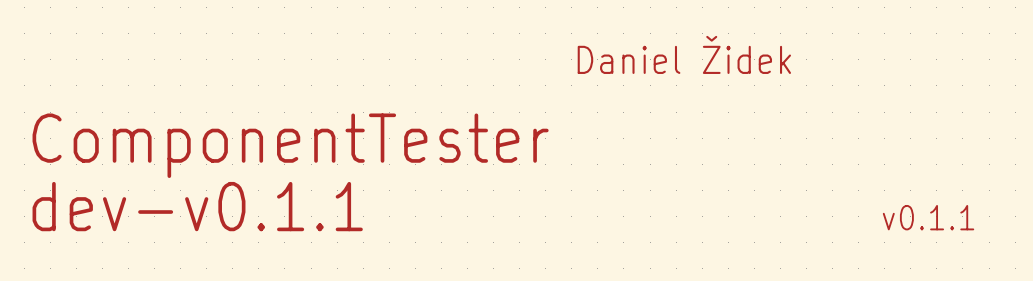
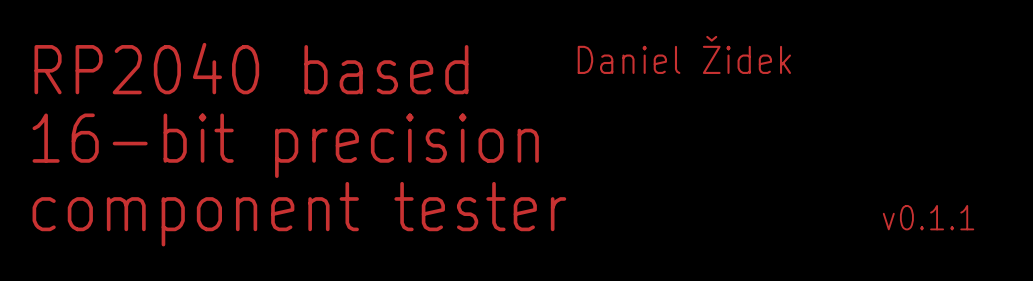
text: none -> RP2040 based (251, 68)
text: ComponentTester (290, 145) -> 16-bit precision (285, 145)
text: dev-v0.1.1 (197, 206) -> component tester (299, 214)

